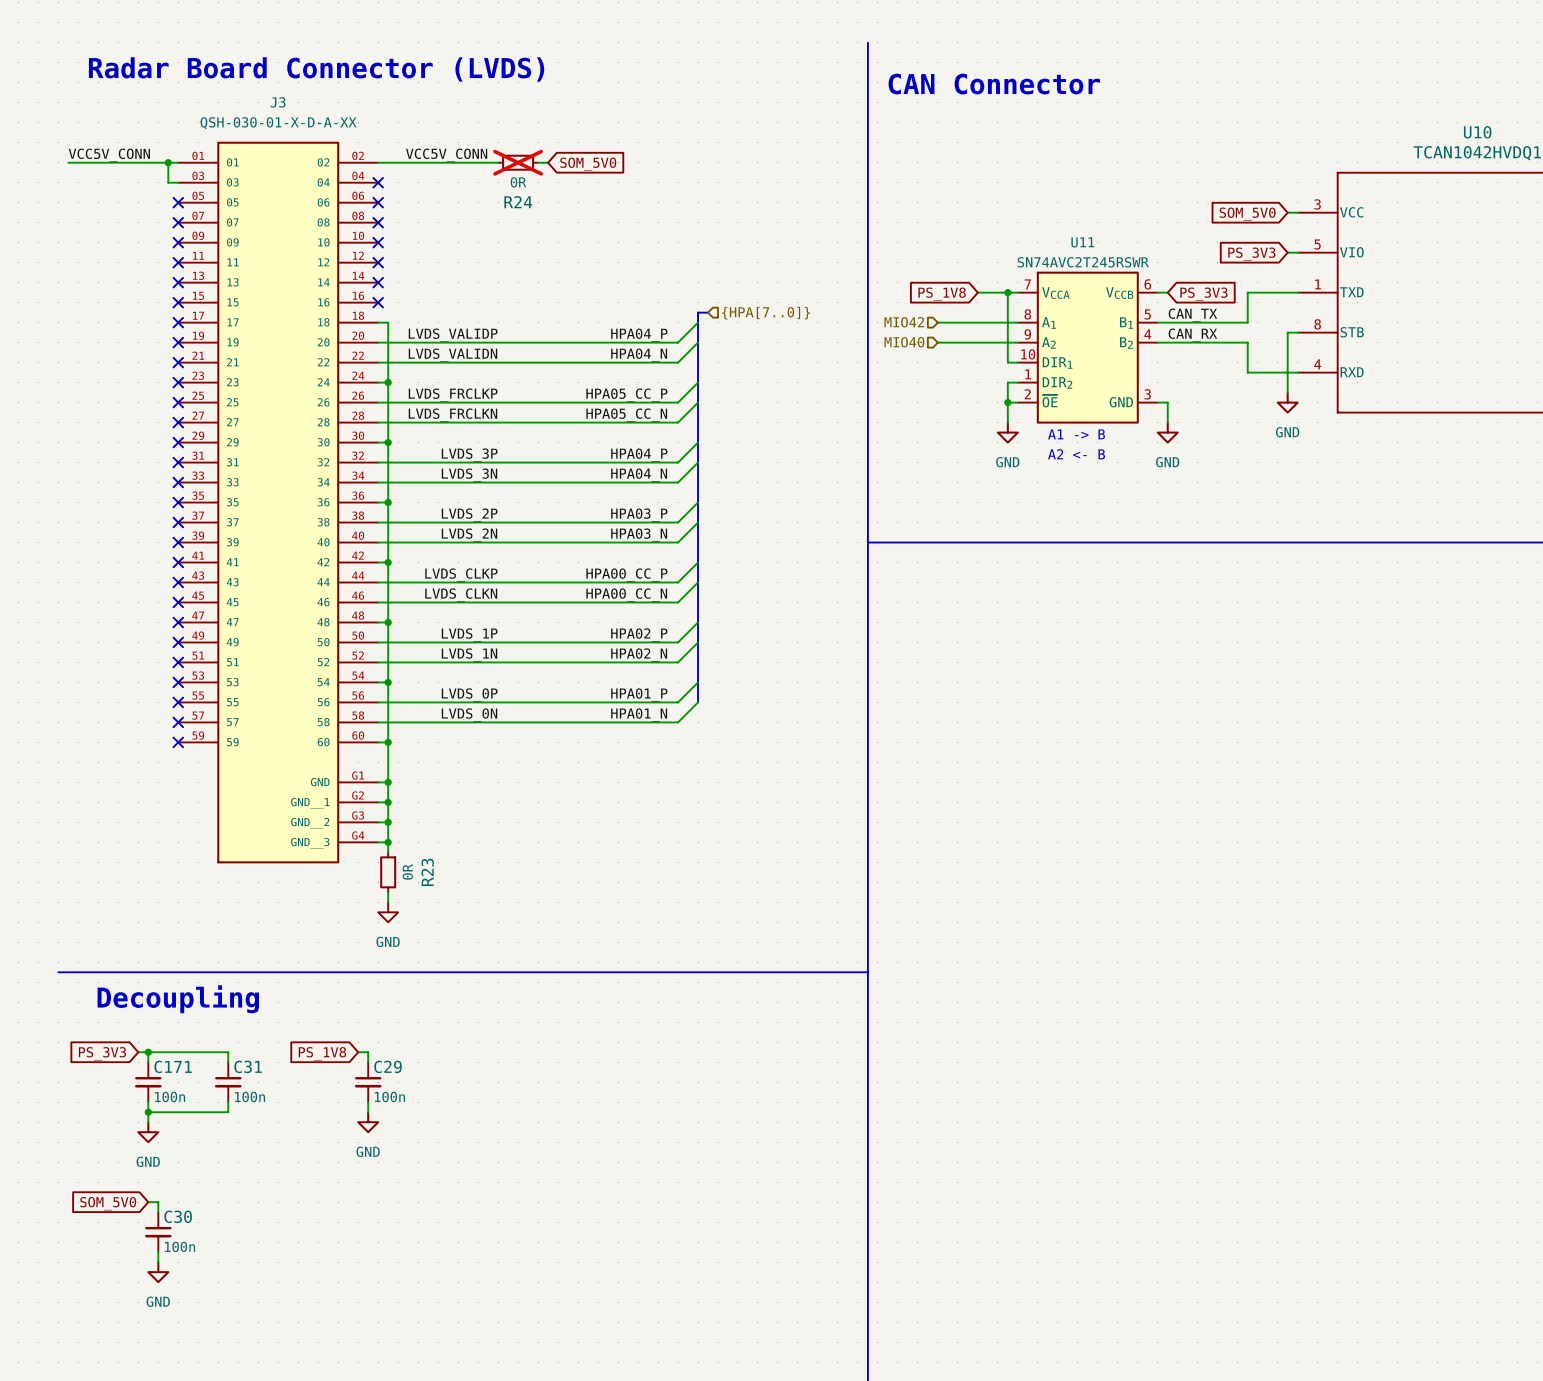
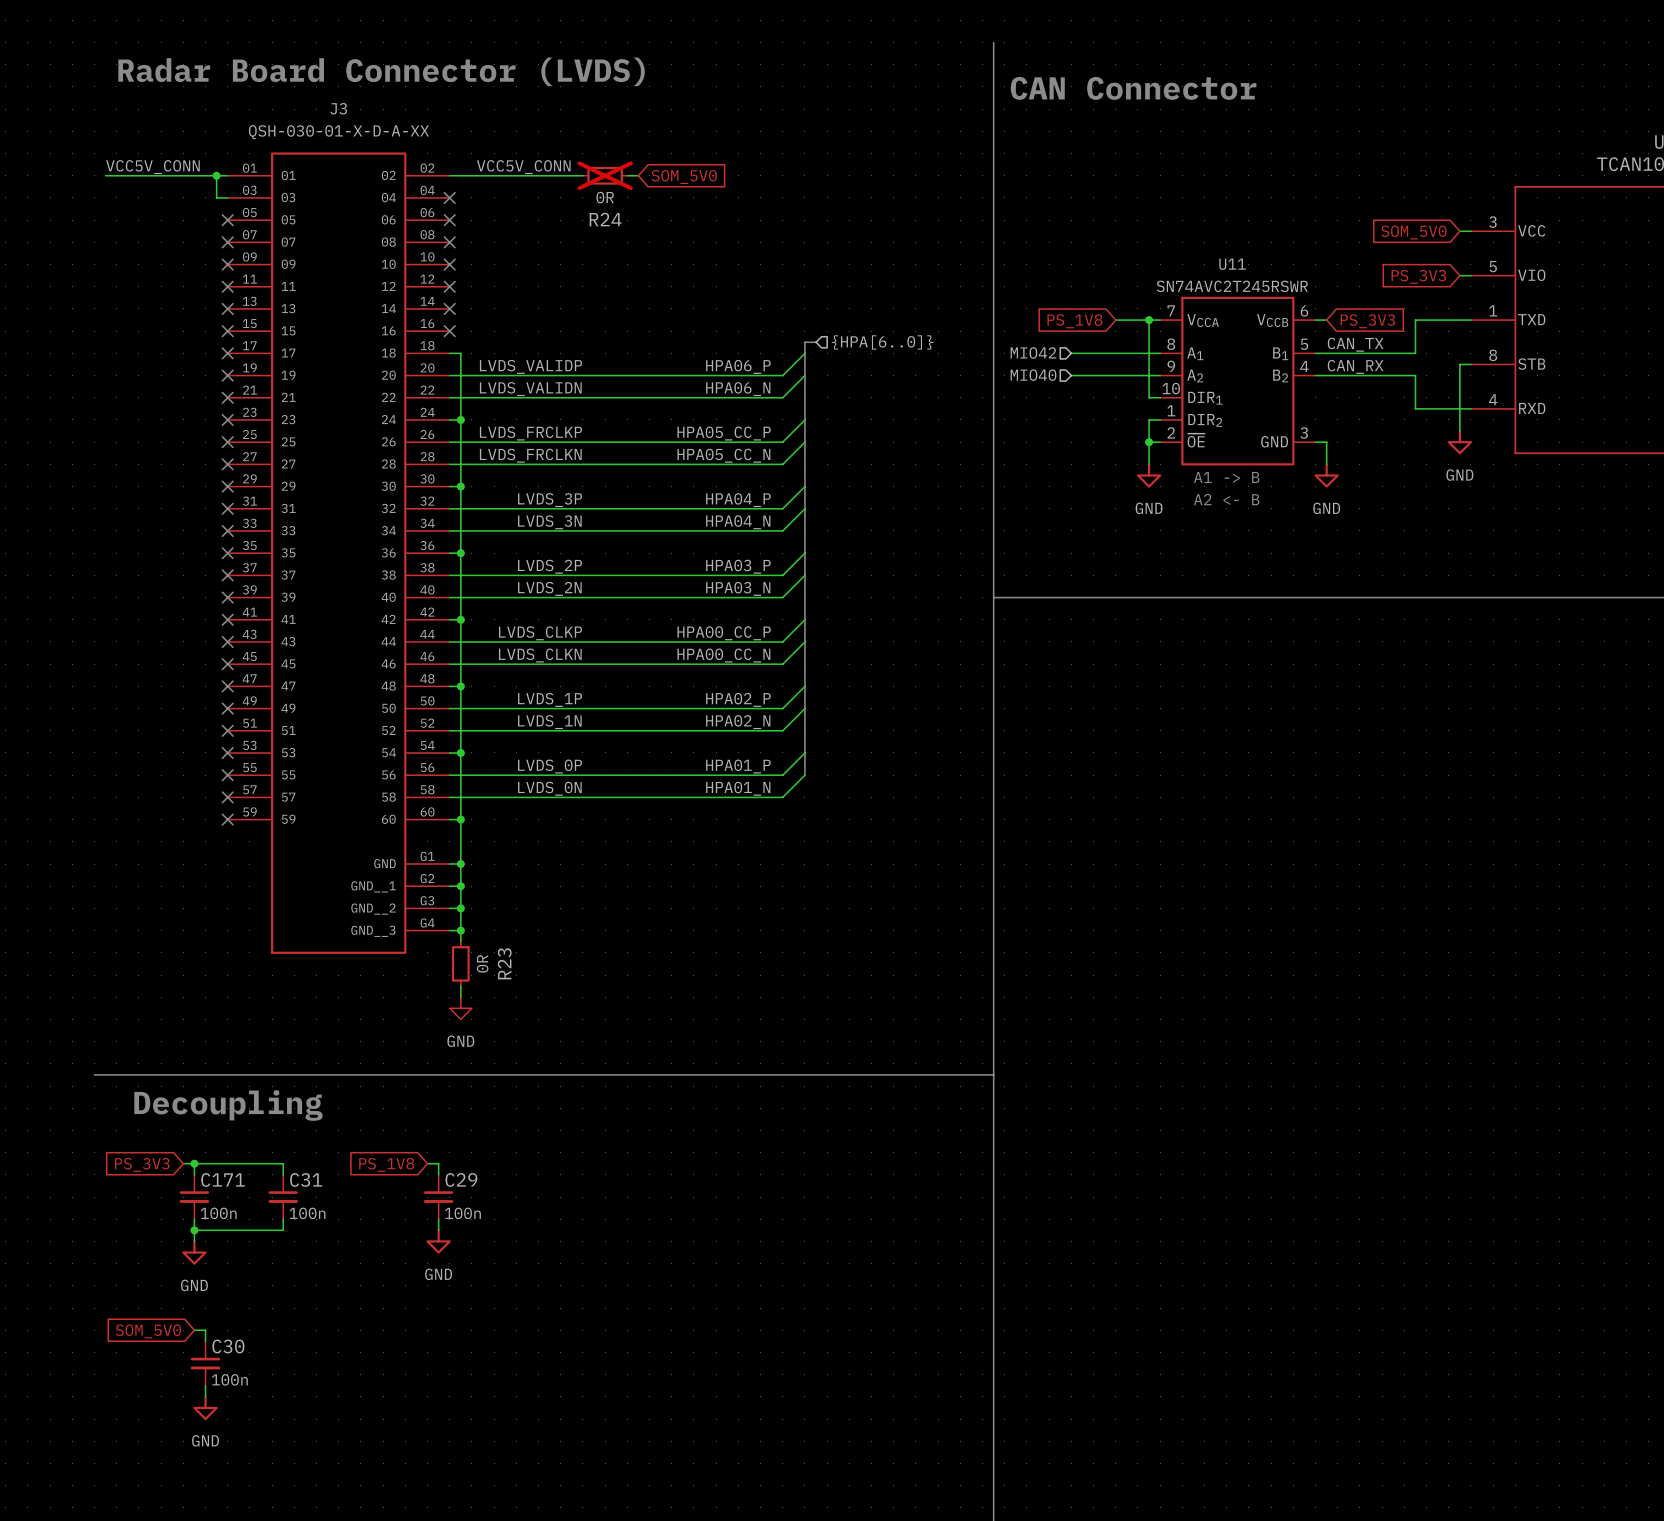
hierarchical label: {HPA[7..0]} (766, 313) -> {HPA[6..0]} (882, 342)
label: HPA04_P (639, 335) -> HPA06_P (738, 366)
label: HPA04_N (639, 355) -> HPA06_N (738, 389)

